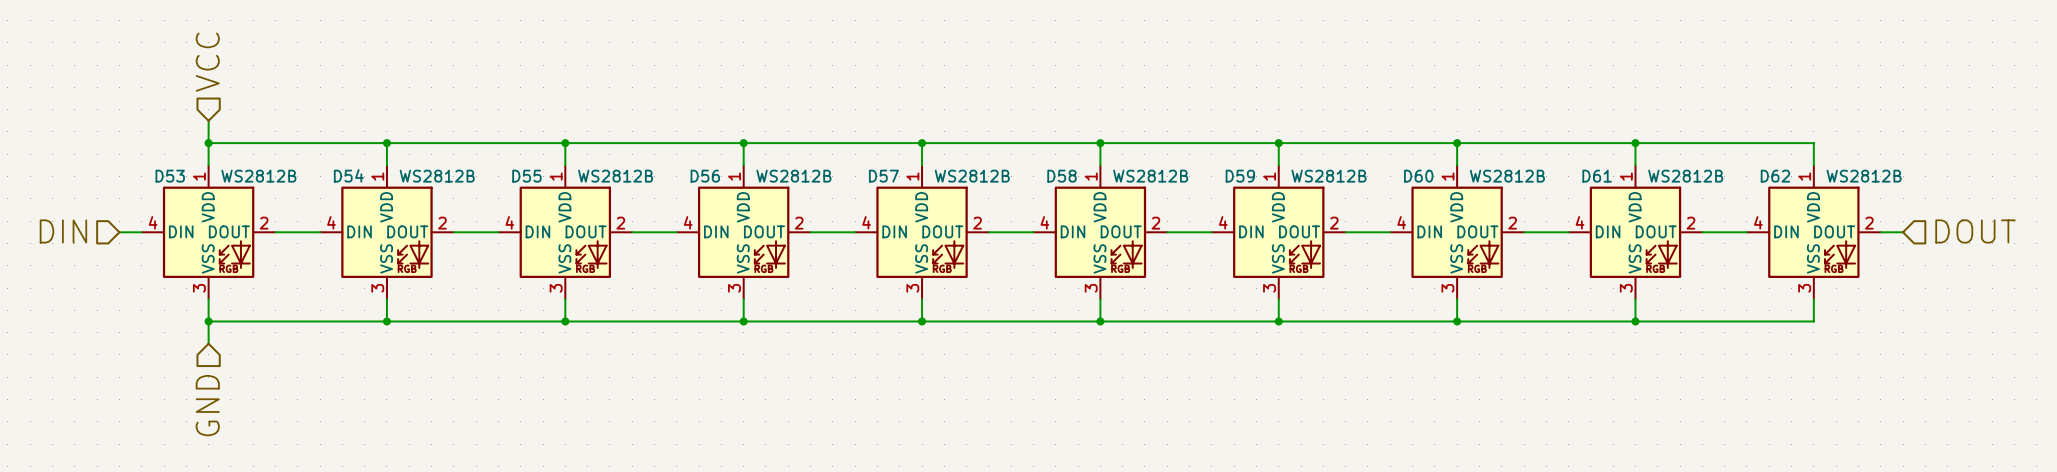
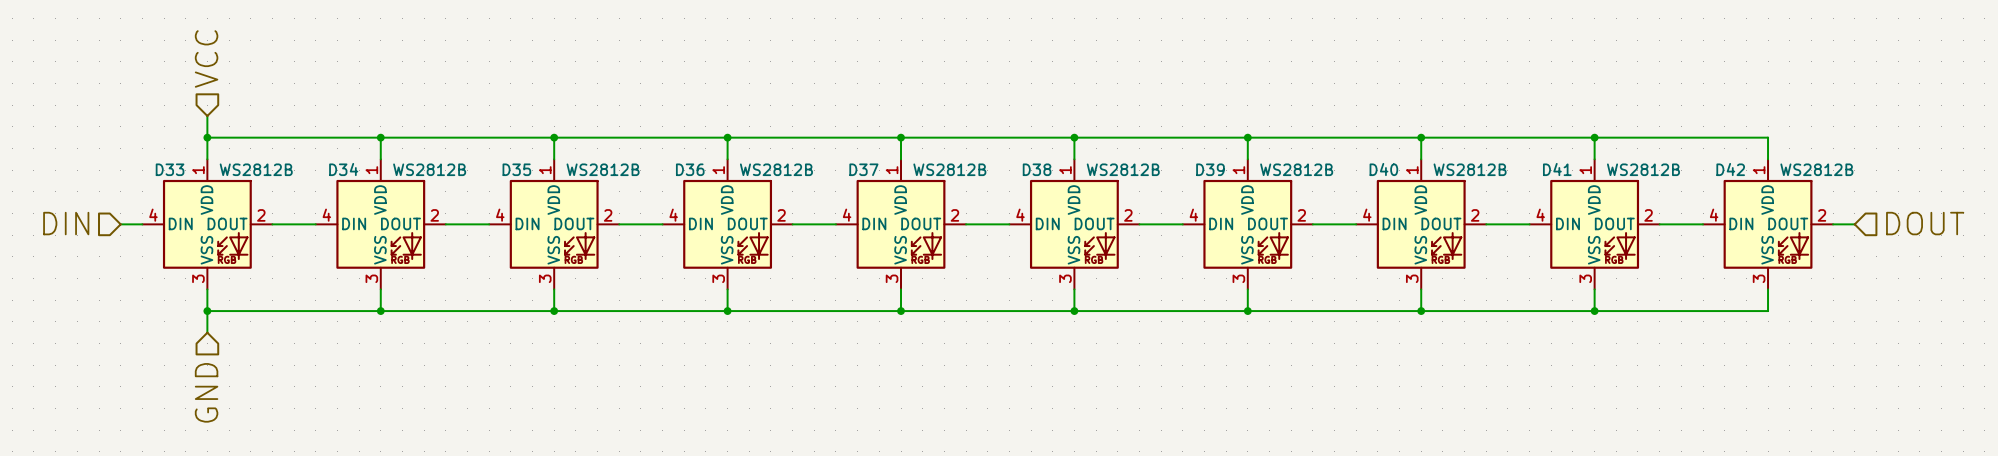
D54 name: D54 (348, 175) -> D34 (343, 169)
D53 name: D53 (170, 176) -> D33 (170, 169)
D55 name: D55 (526, 176) -> D35 (516, 169)
D56 name: D56 (705, 176) -> D36 (690, 169)
D57 name: D57 (883, 176) -> D37 (863, 169)
D58 name: D58 (1062, 176) -> D38 (1037, 169)
D59 name: D59 (1240, 176) -> D39 (1210, 169)
D60 name: D60 (1418, 176) -> D40 (1383, 169)
D61 name: D61 (1597, 176) -> D41 (1557, 169)
D62 name: D62 (1775, 176) -> D42 (1730, 169)

